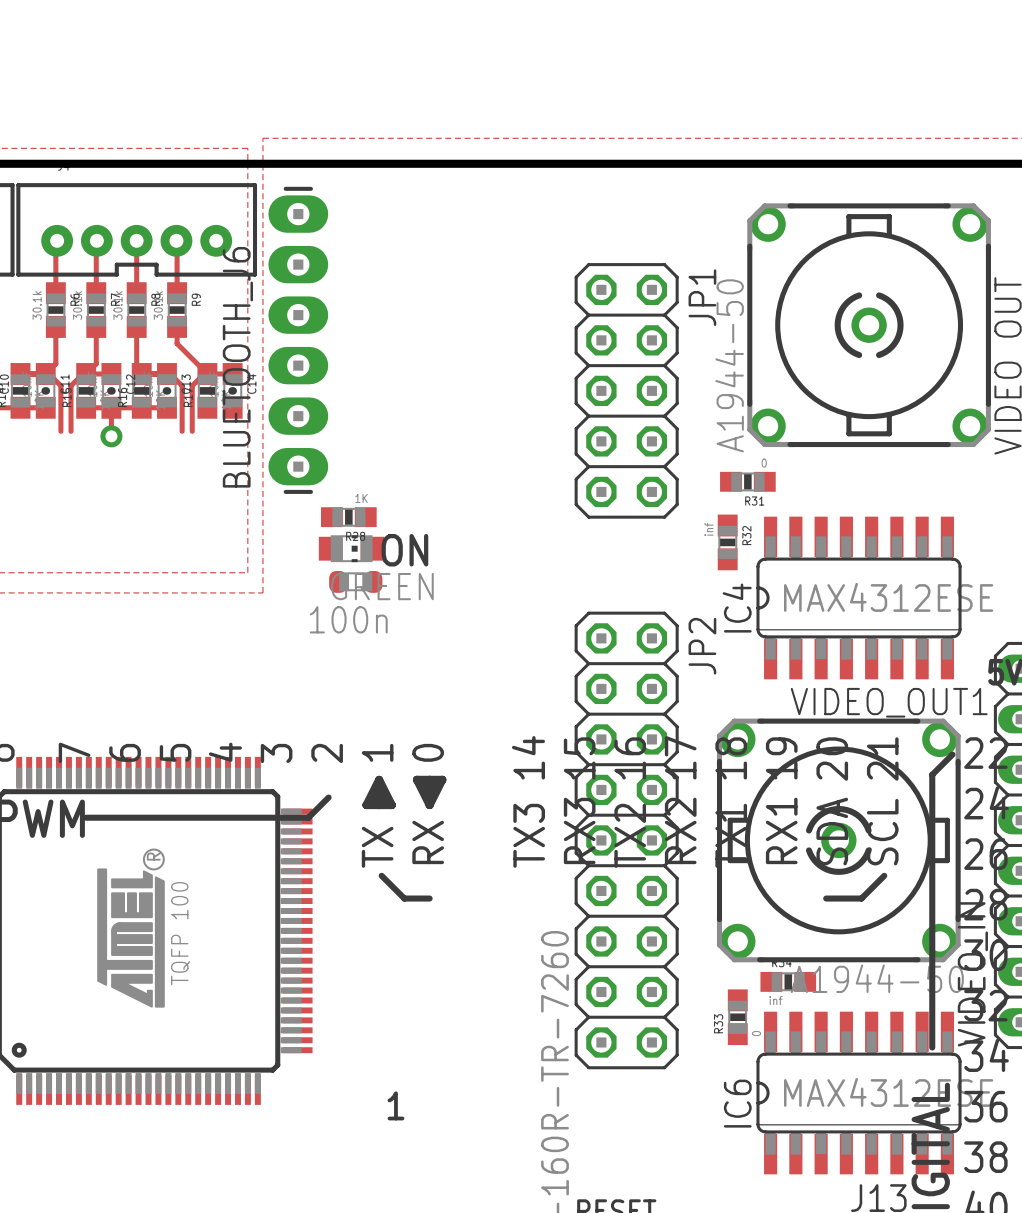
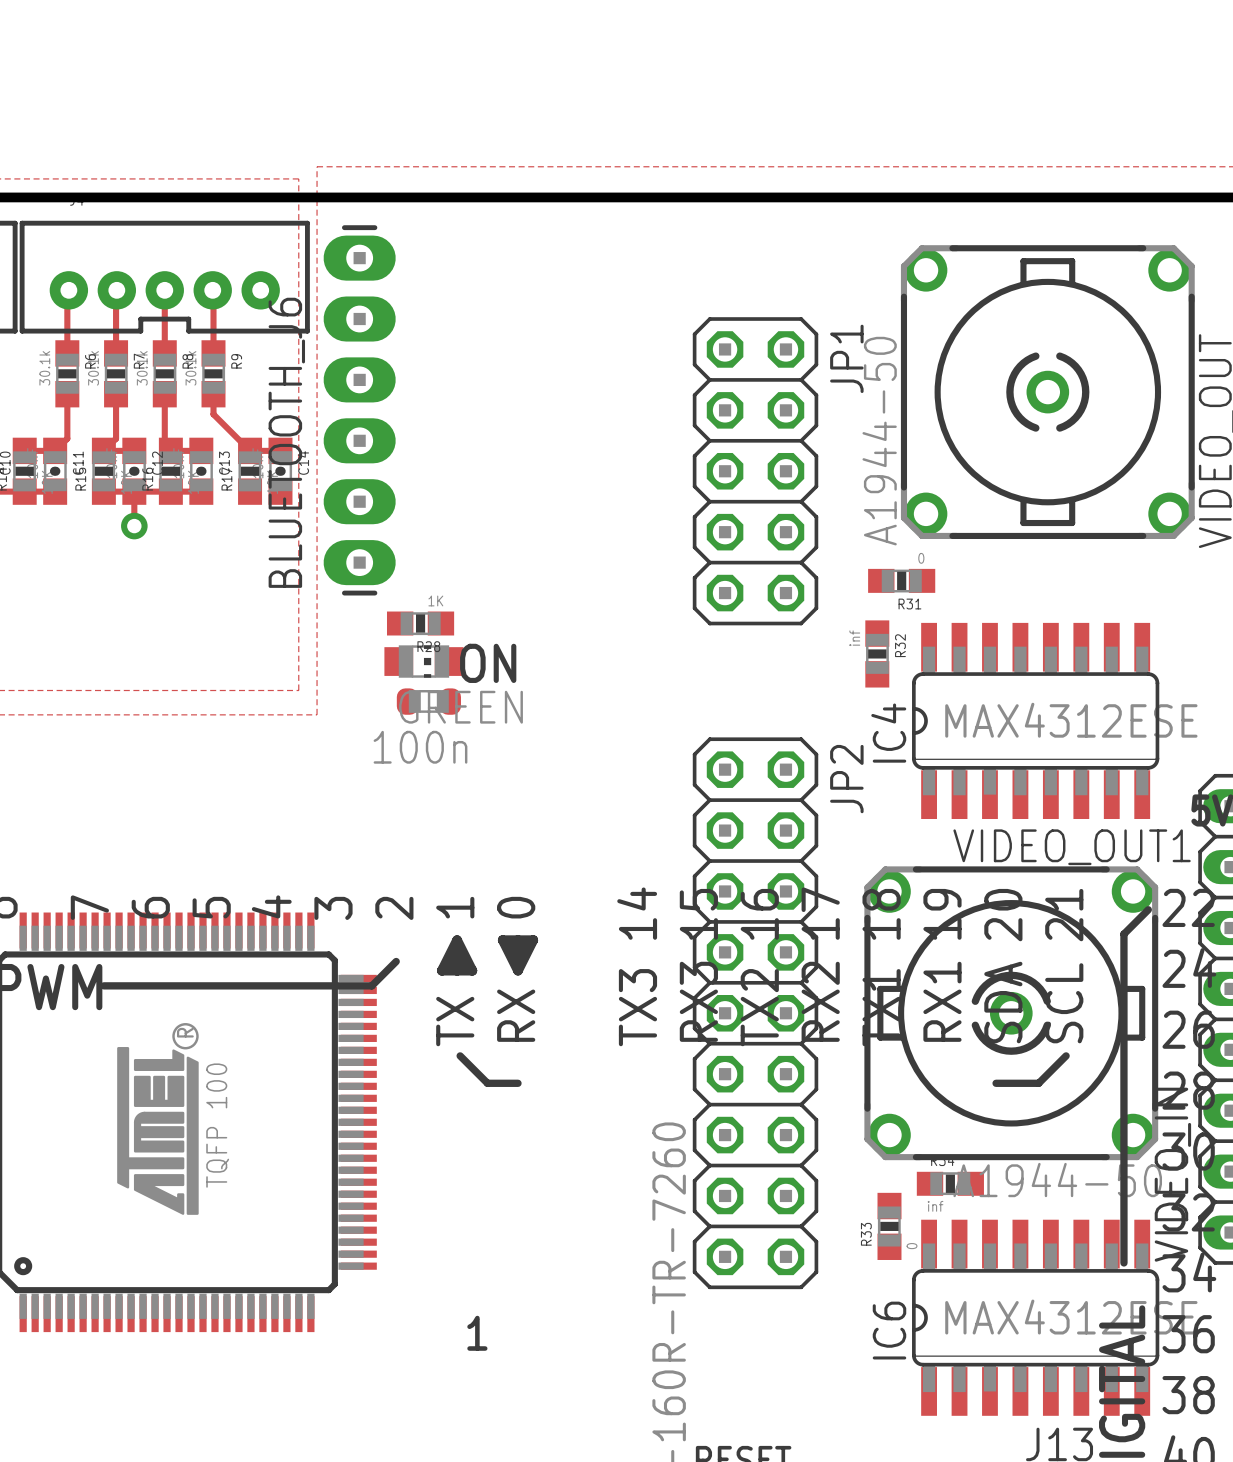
track: (45, 373) (49, 373) (60, 385) (60, 431) -> none
track: (86, 373) (82, 373) (71, 385) (71, 431) -> none
track: (166, 373) (170, 373) (182, 385) (182, 431) -> none
track: (207, 373) (204, 373) (192, 385) (192, 431) -> none

